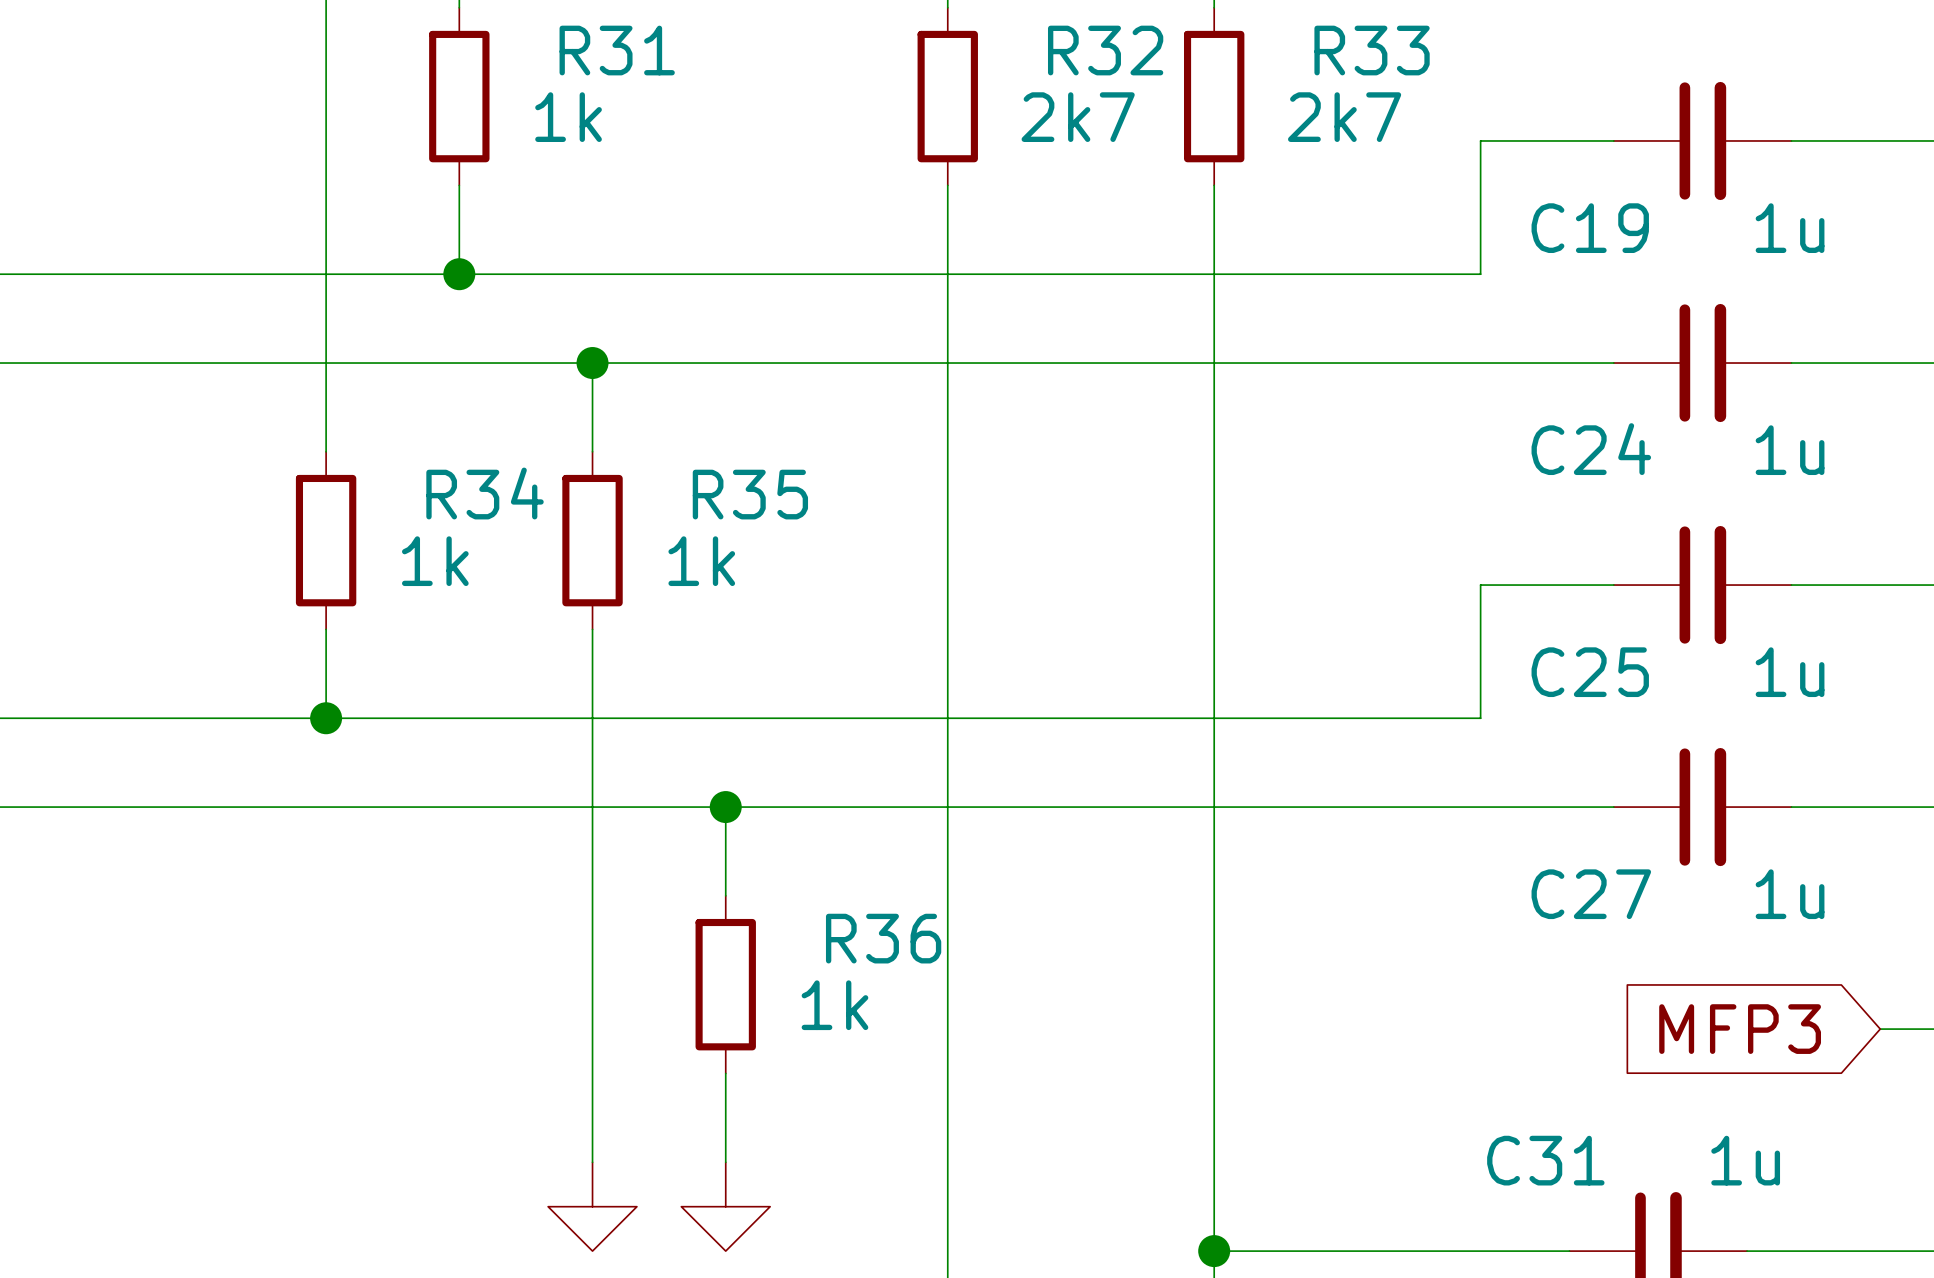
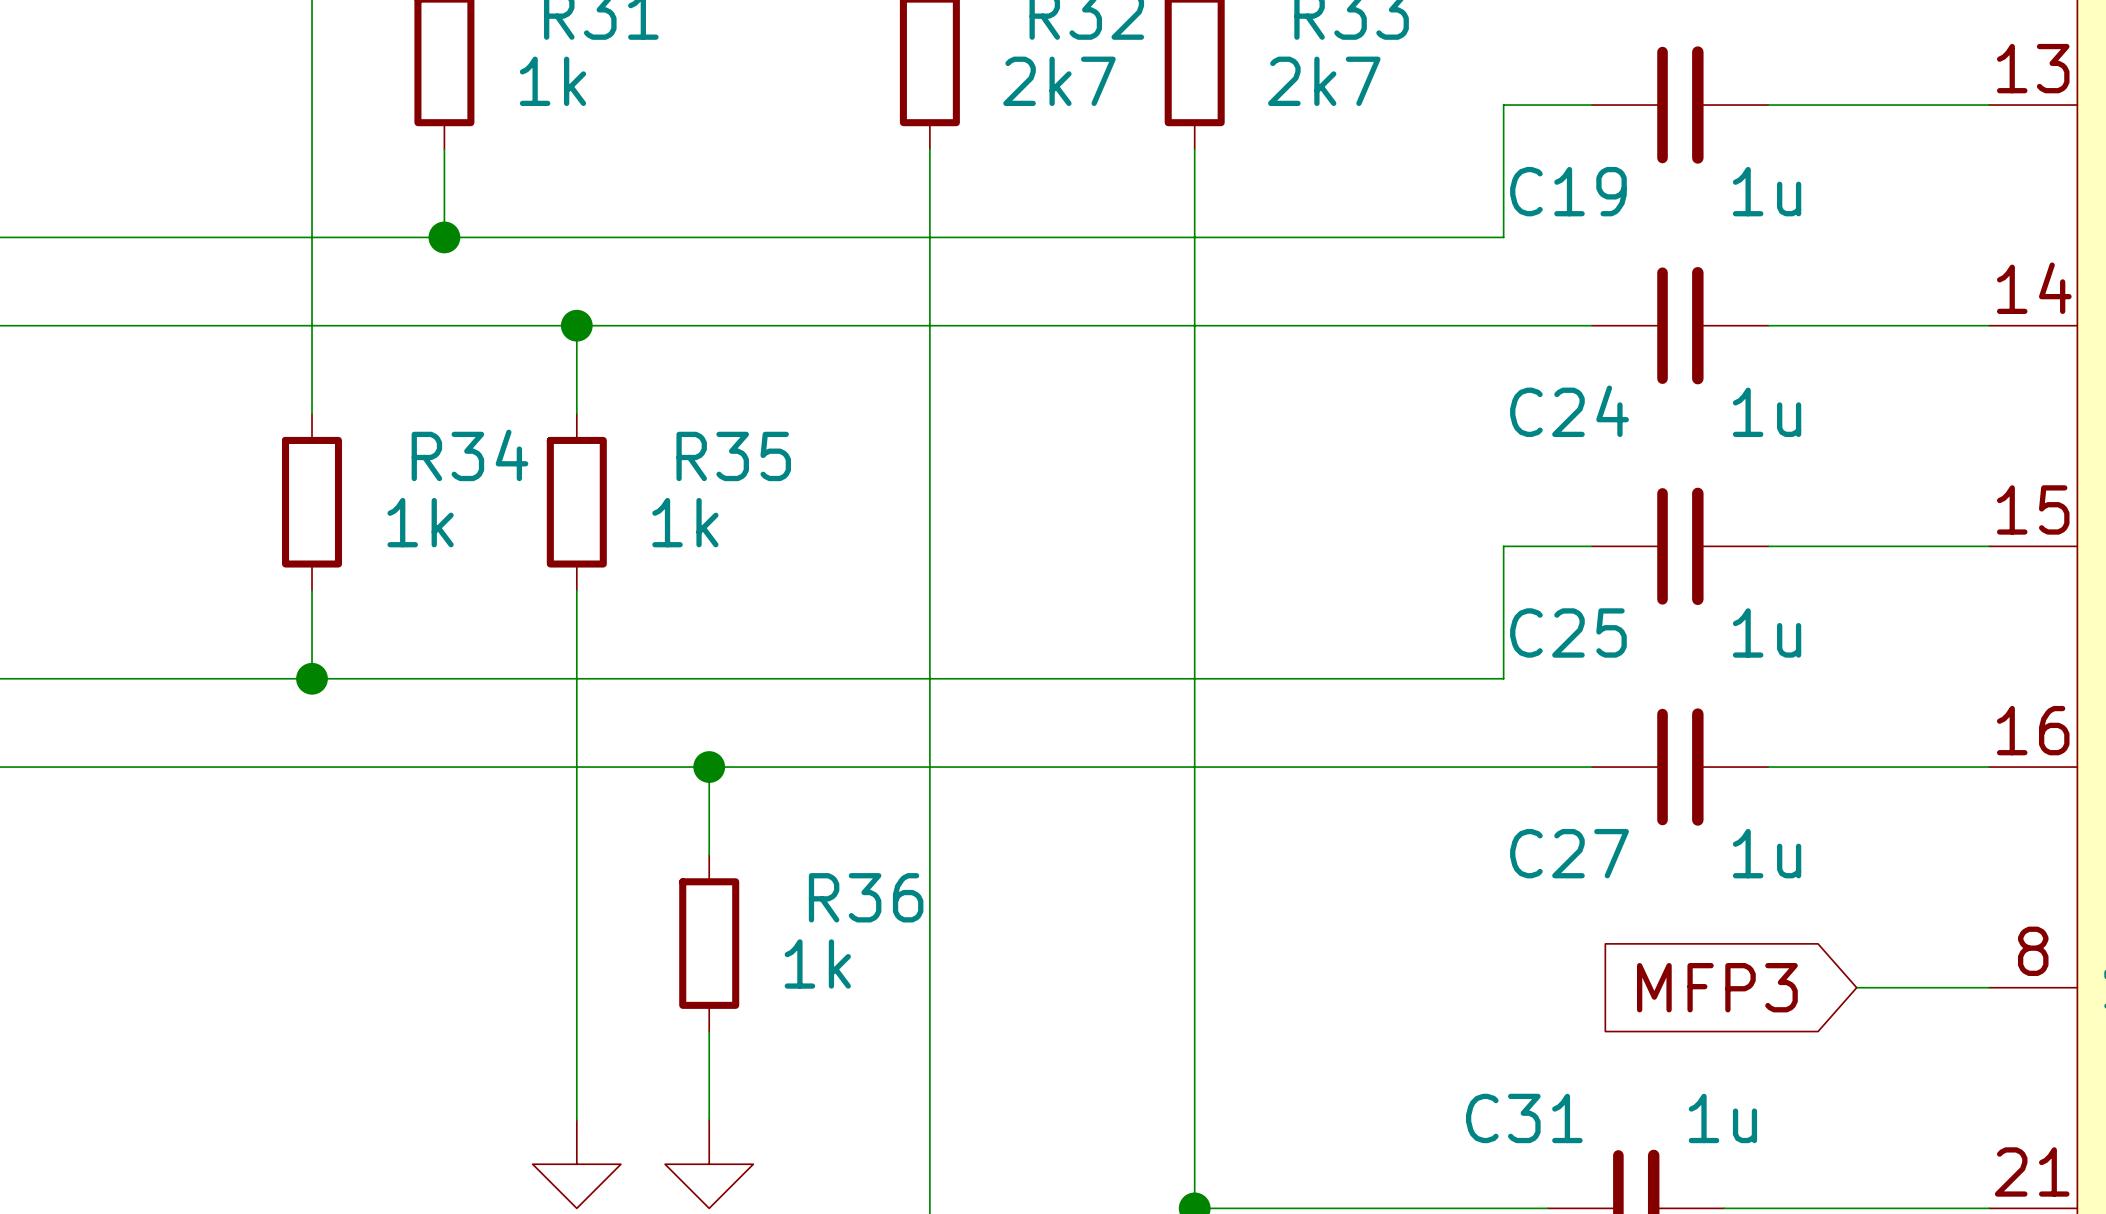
wire: (1525, 140) (1480, 140) (1480, 274) -> (1503, 105) (1503, 237) (1459, 237)
wire: (1525, 585) (1480, 585) (1480, 718) -> (1503, 546) (1503, 678) (1459, 678)

